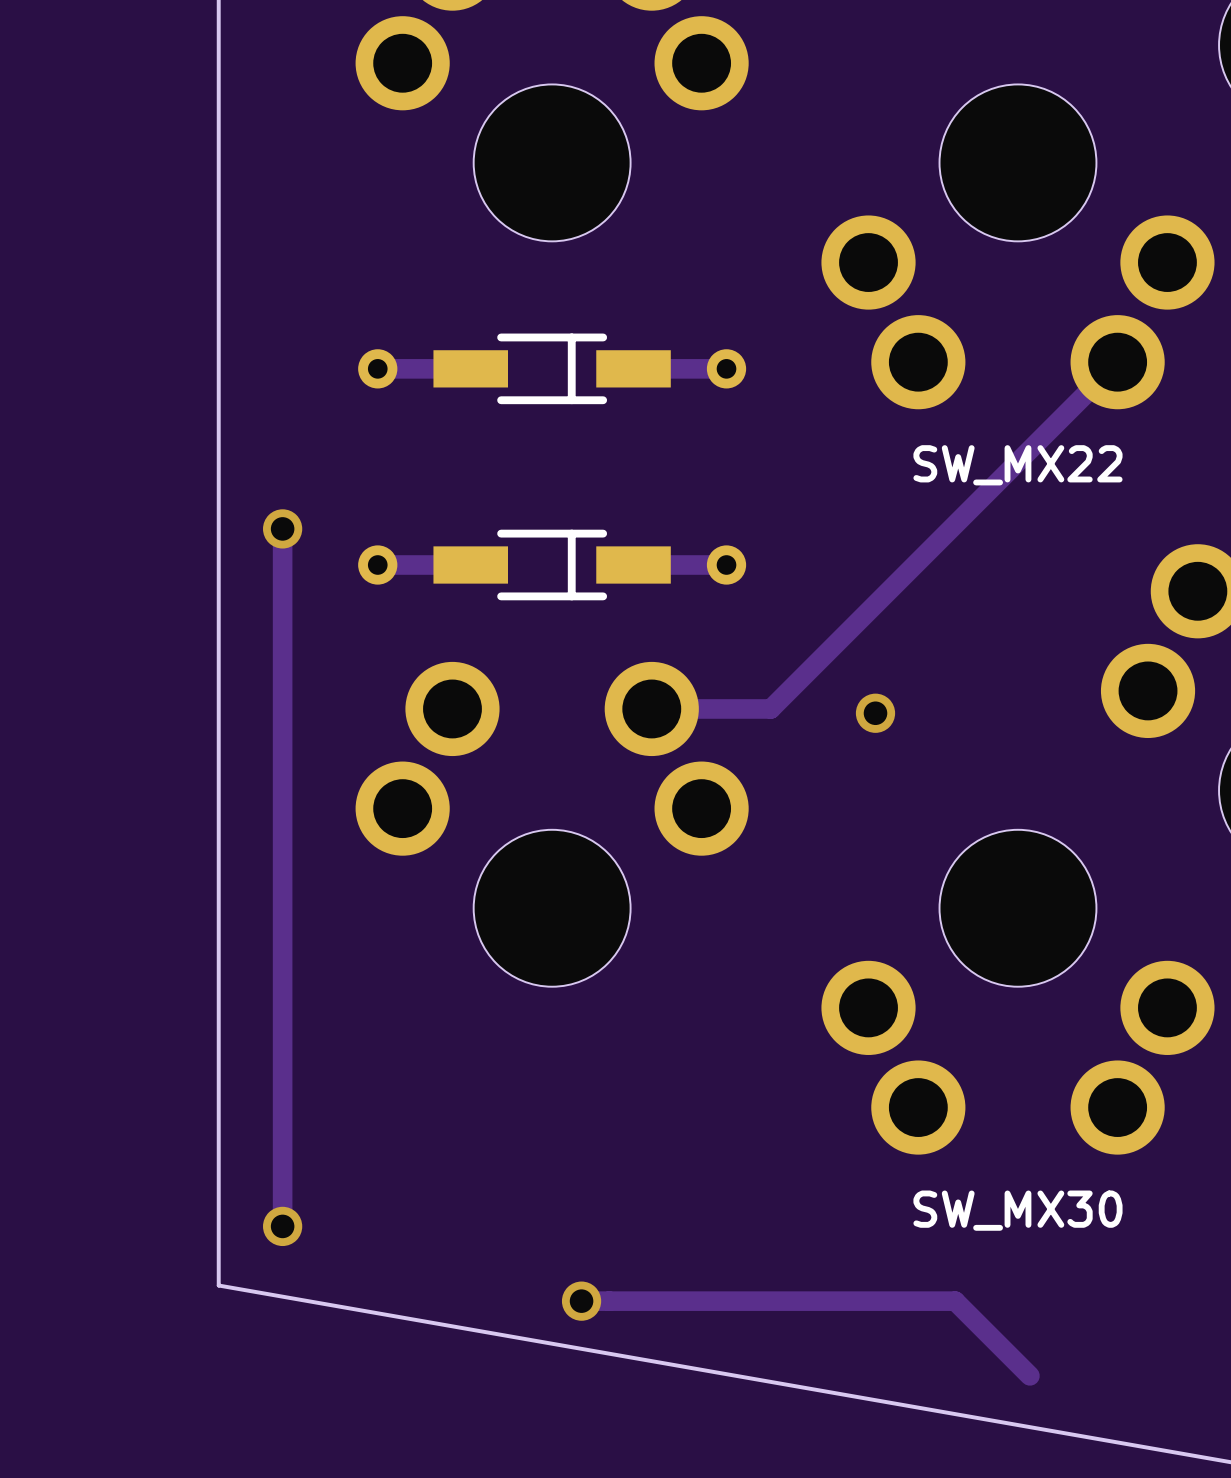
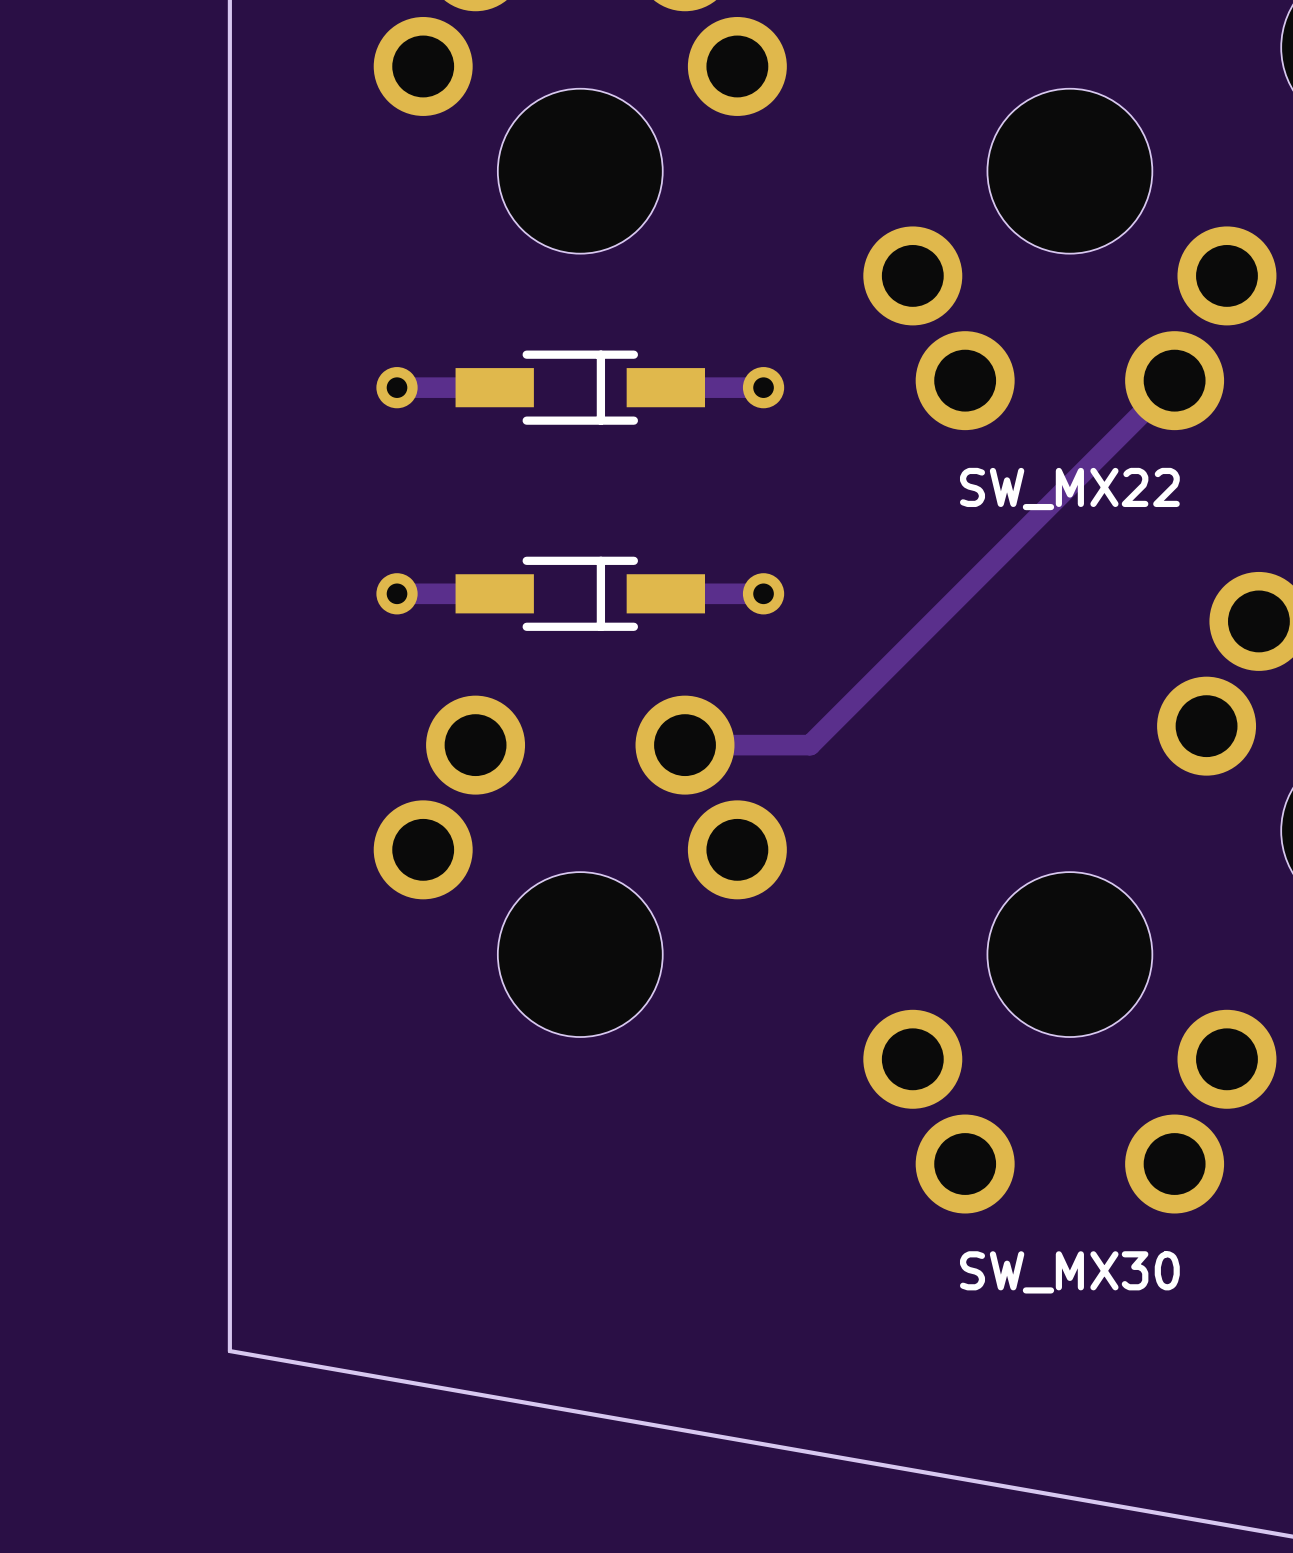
track: (282, 528) (282, 1226) -> none
via: (282, 528) -> none
via: (875, 713) -> none
via: (282, 1226) -> none
track: (581, 1301) (955, 1301) (1029, 1375) -> none
via: (581, 1301) -> none

